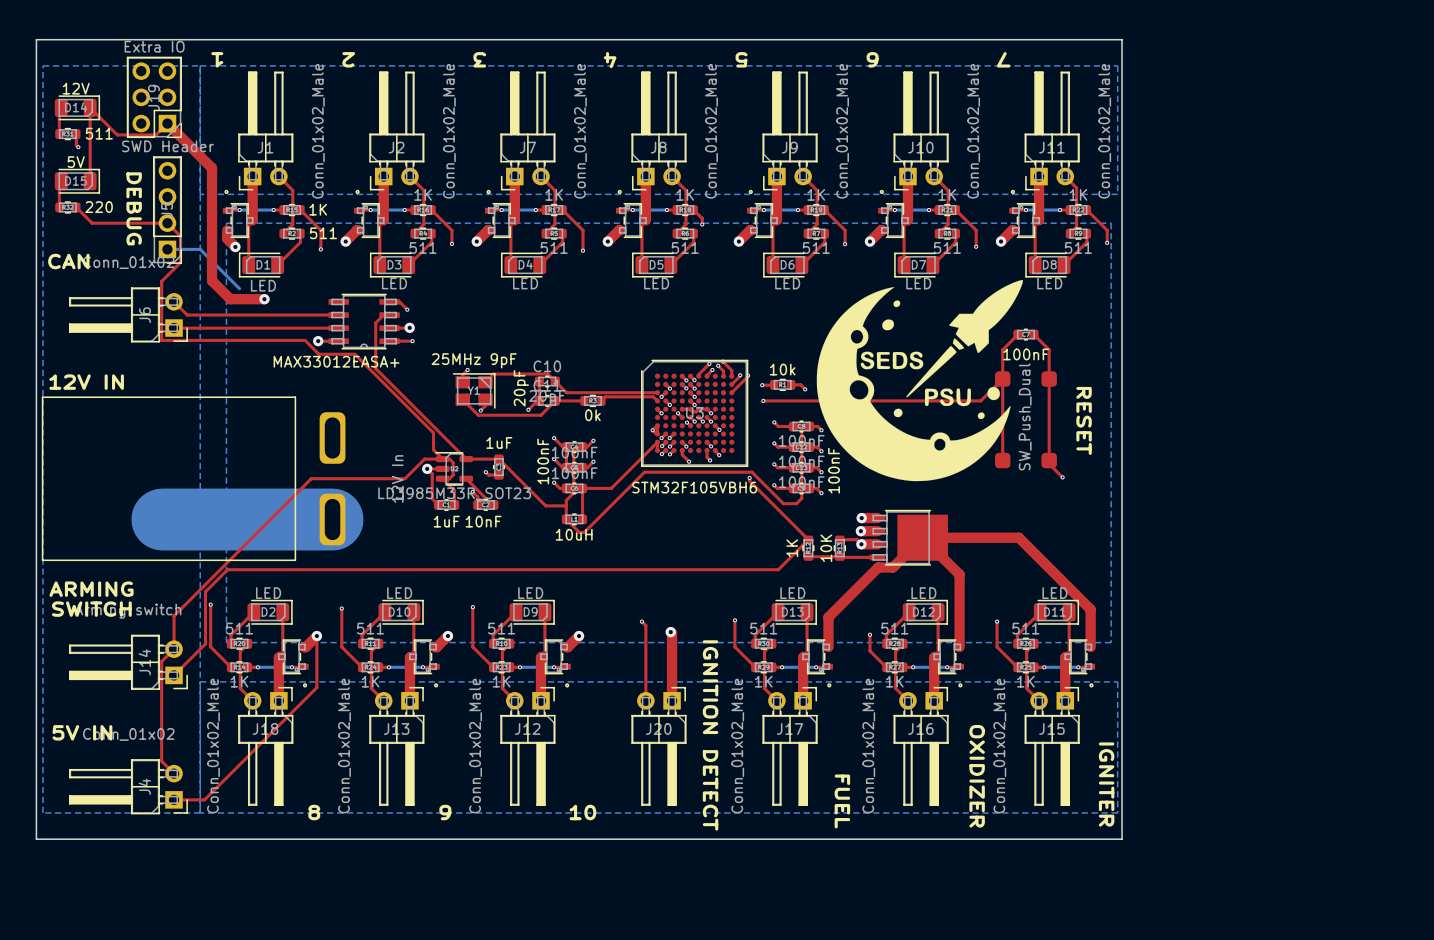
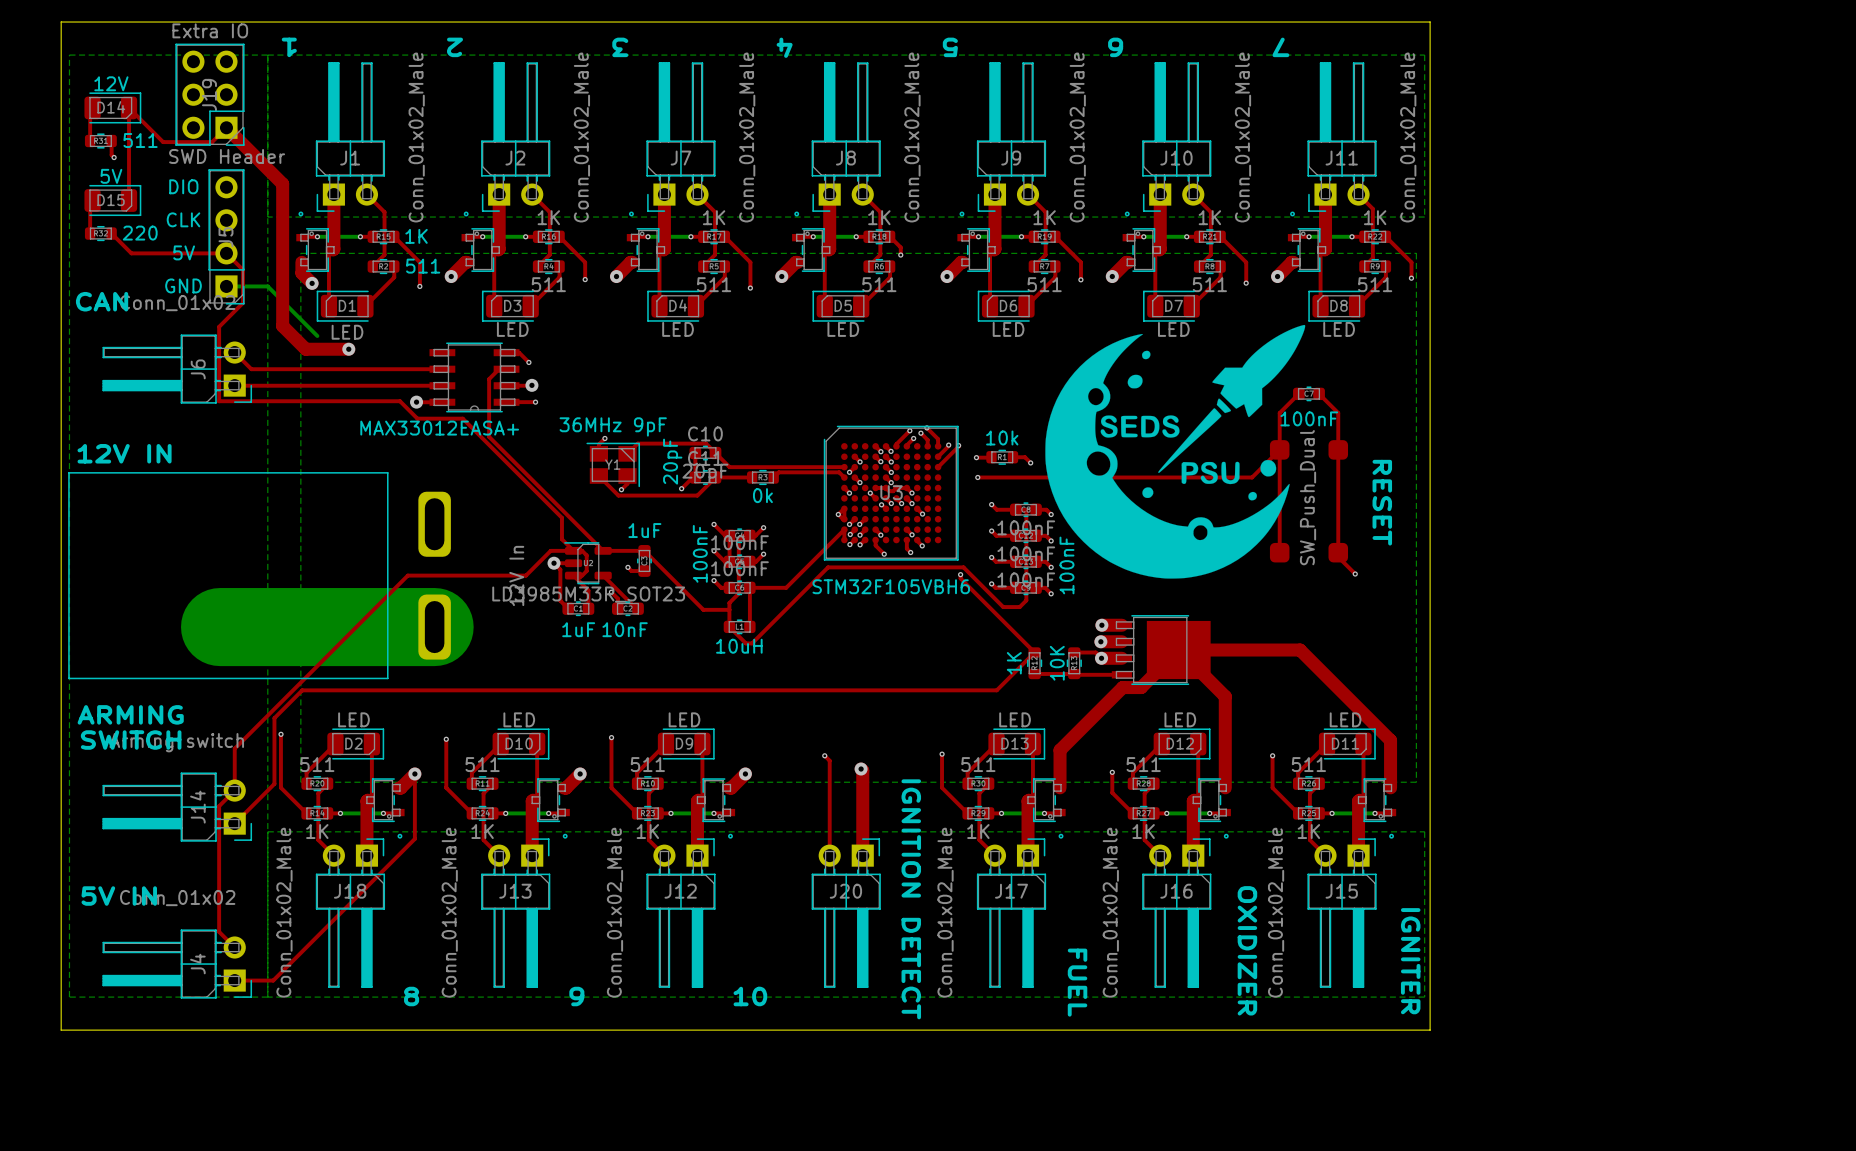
text: none -> DIO (183, 186)
text: none -> CLK (183, 219)
text: DEBUG (134, 208) -> none
text: none -> 5V (184, 252)
text: none -> GND (183, 285)
Y1 value: 25MHz 9pF (474, 360) -> 36MHz 9pF (613, 426)

